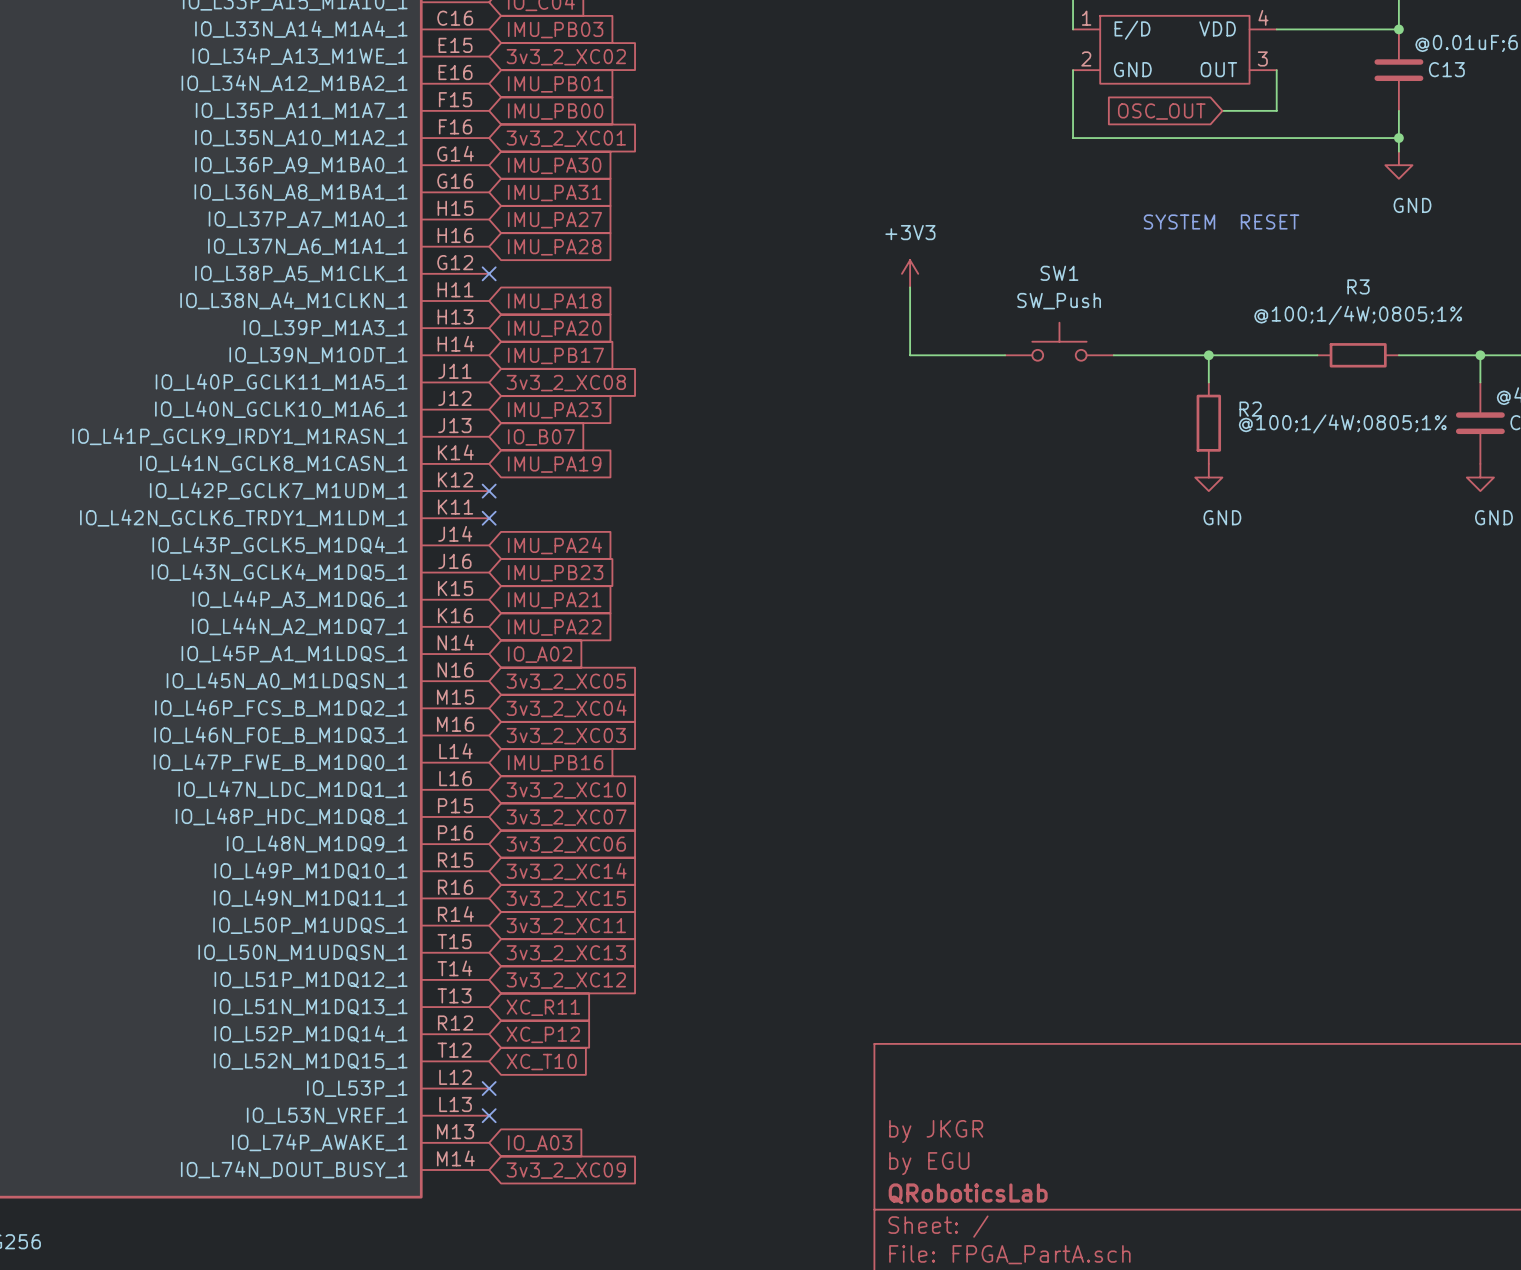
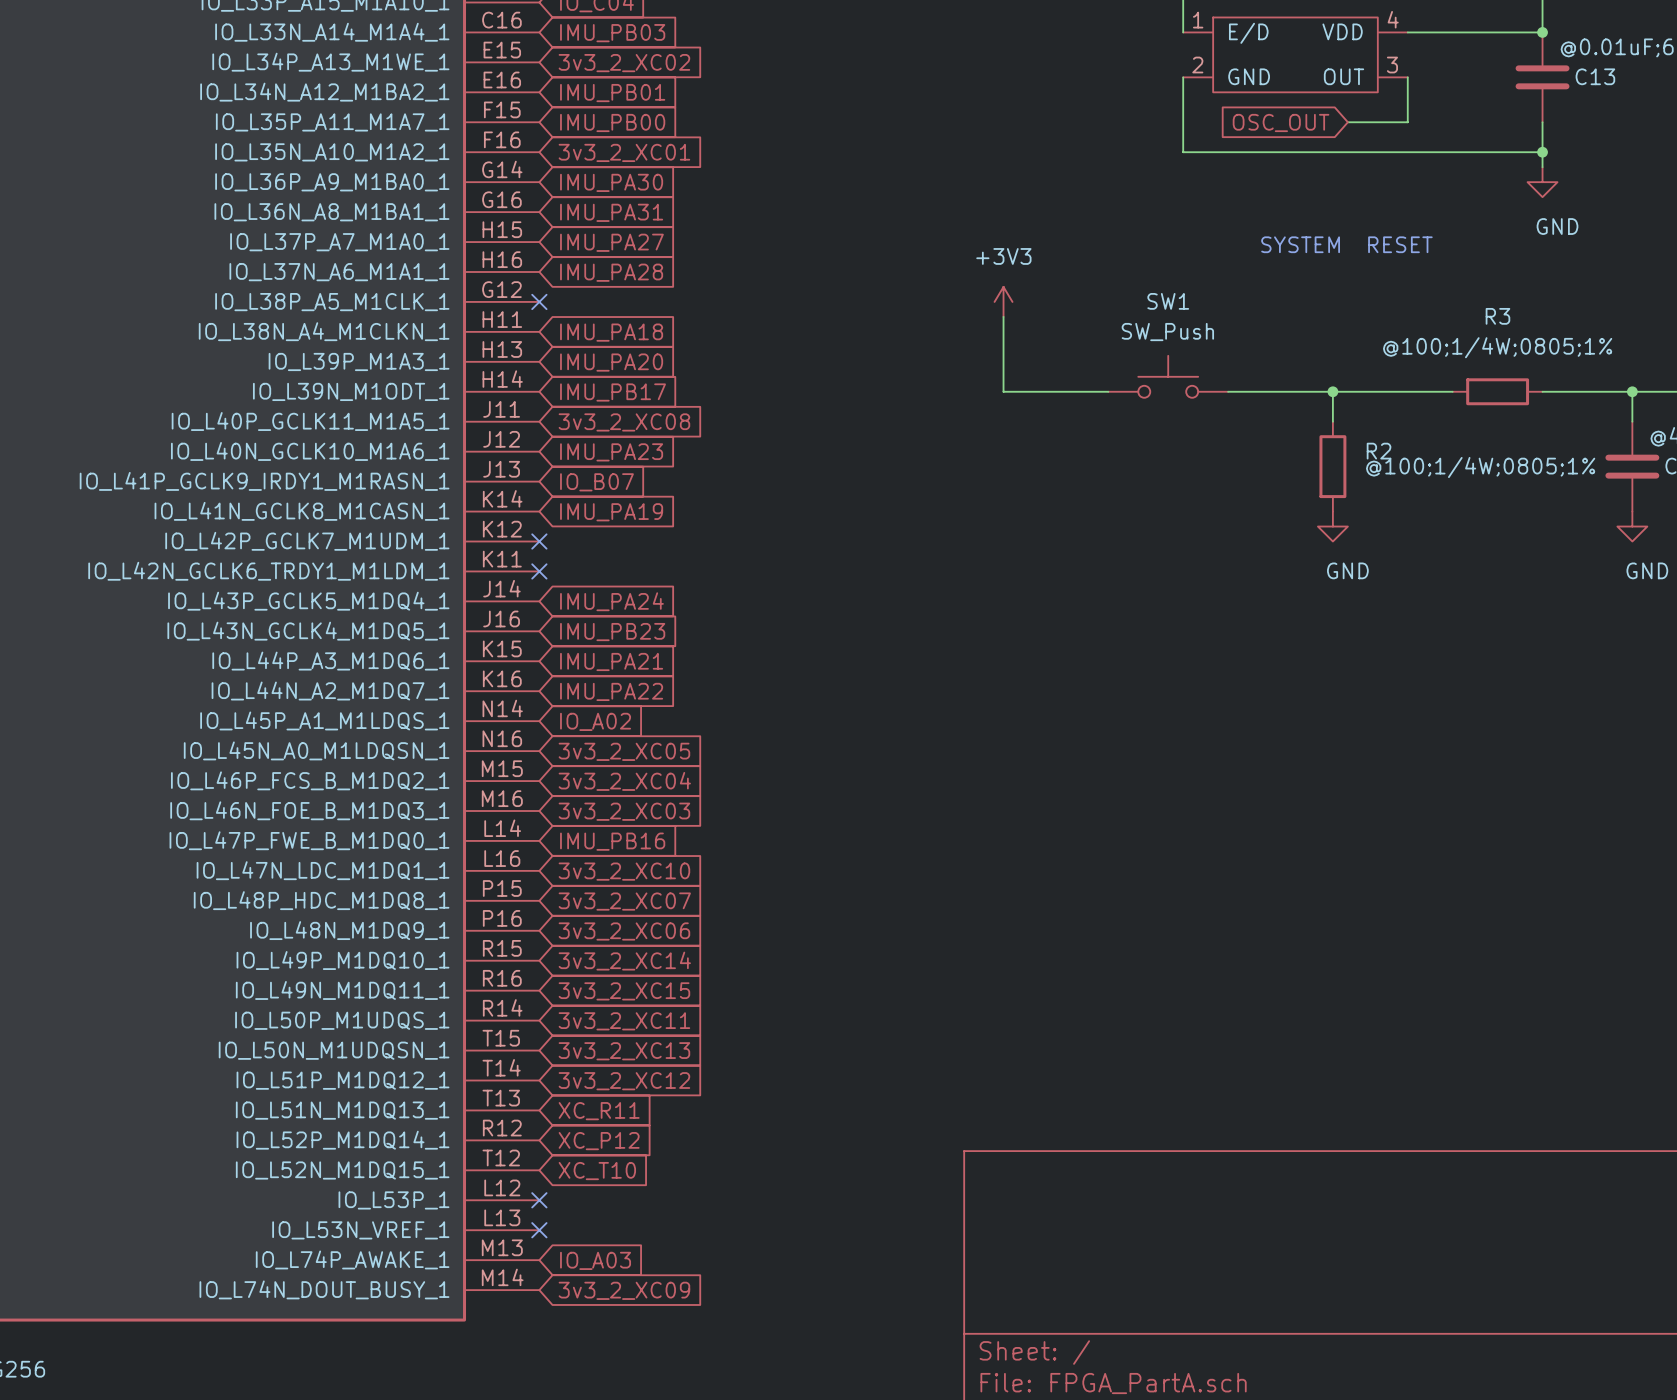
title block: by JKGR (936, 1131) -> none
title block: by EGU (929, 1163) -> none
title block: QRoboticsLab (968, 1193) -> none

